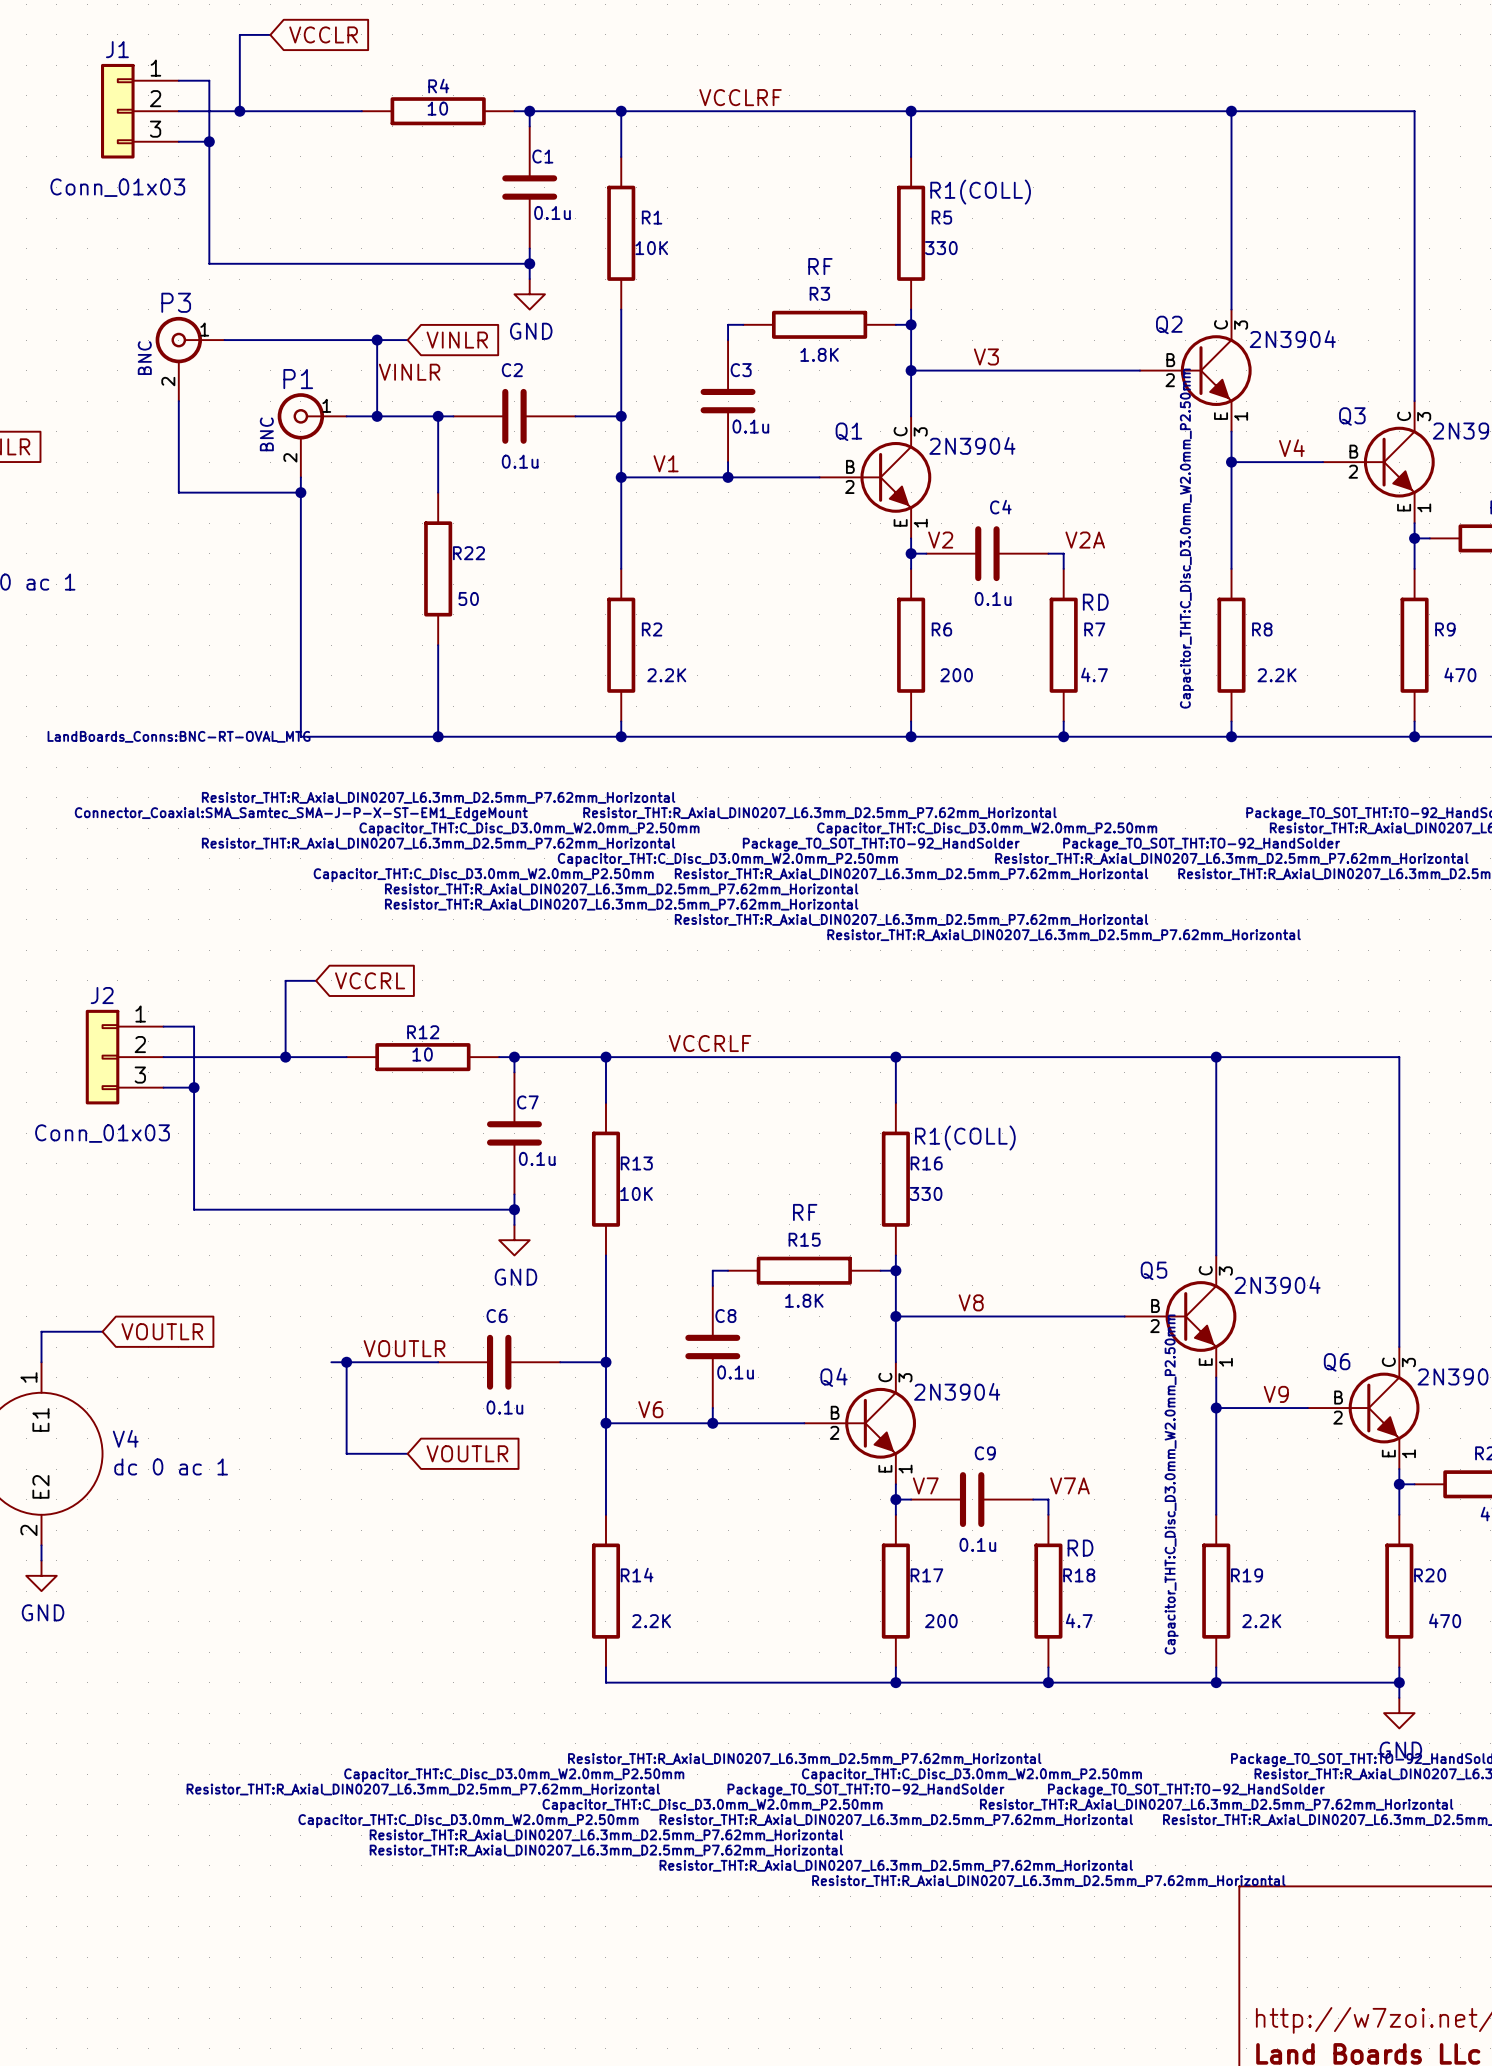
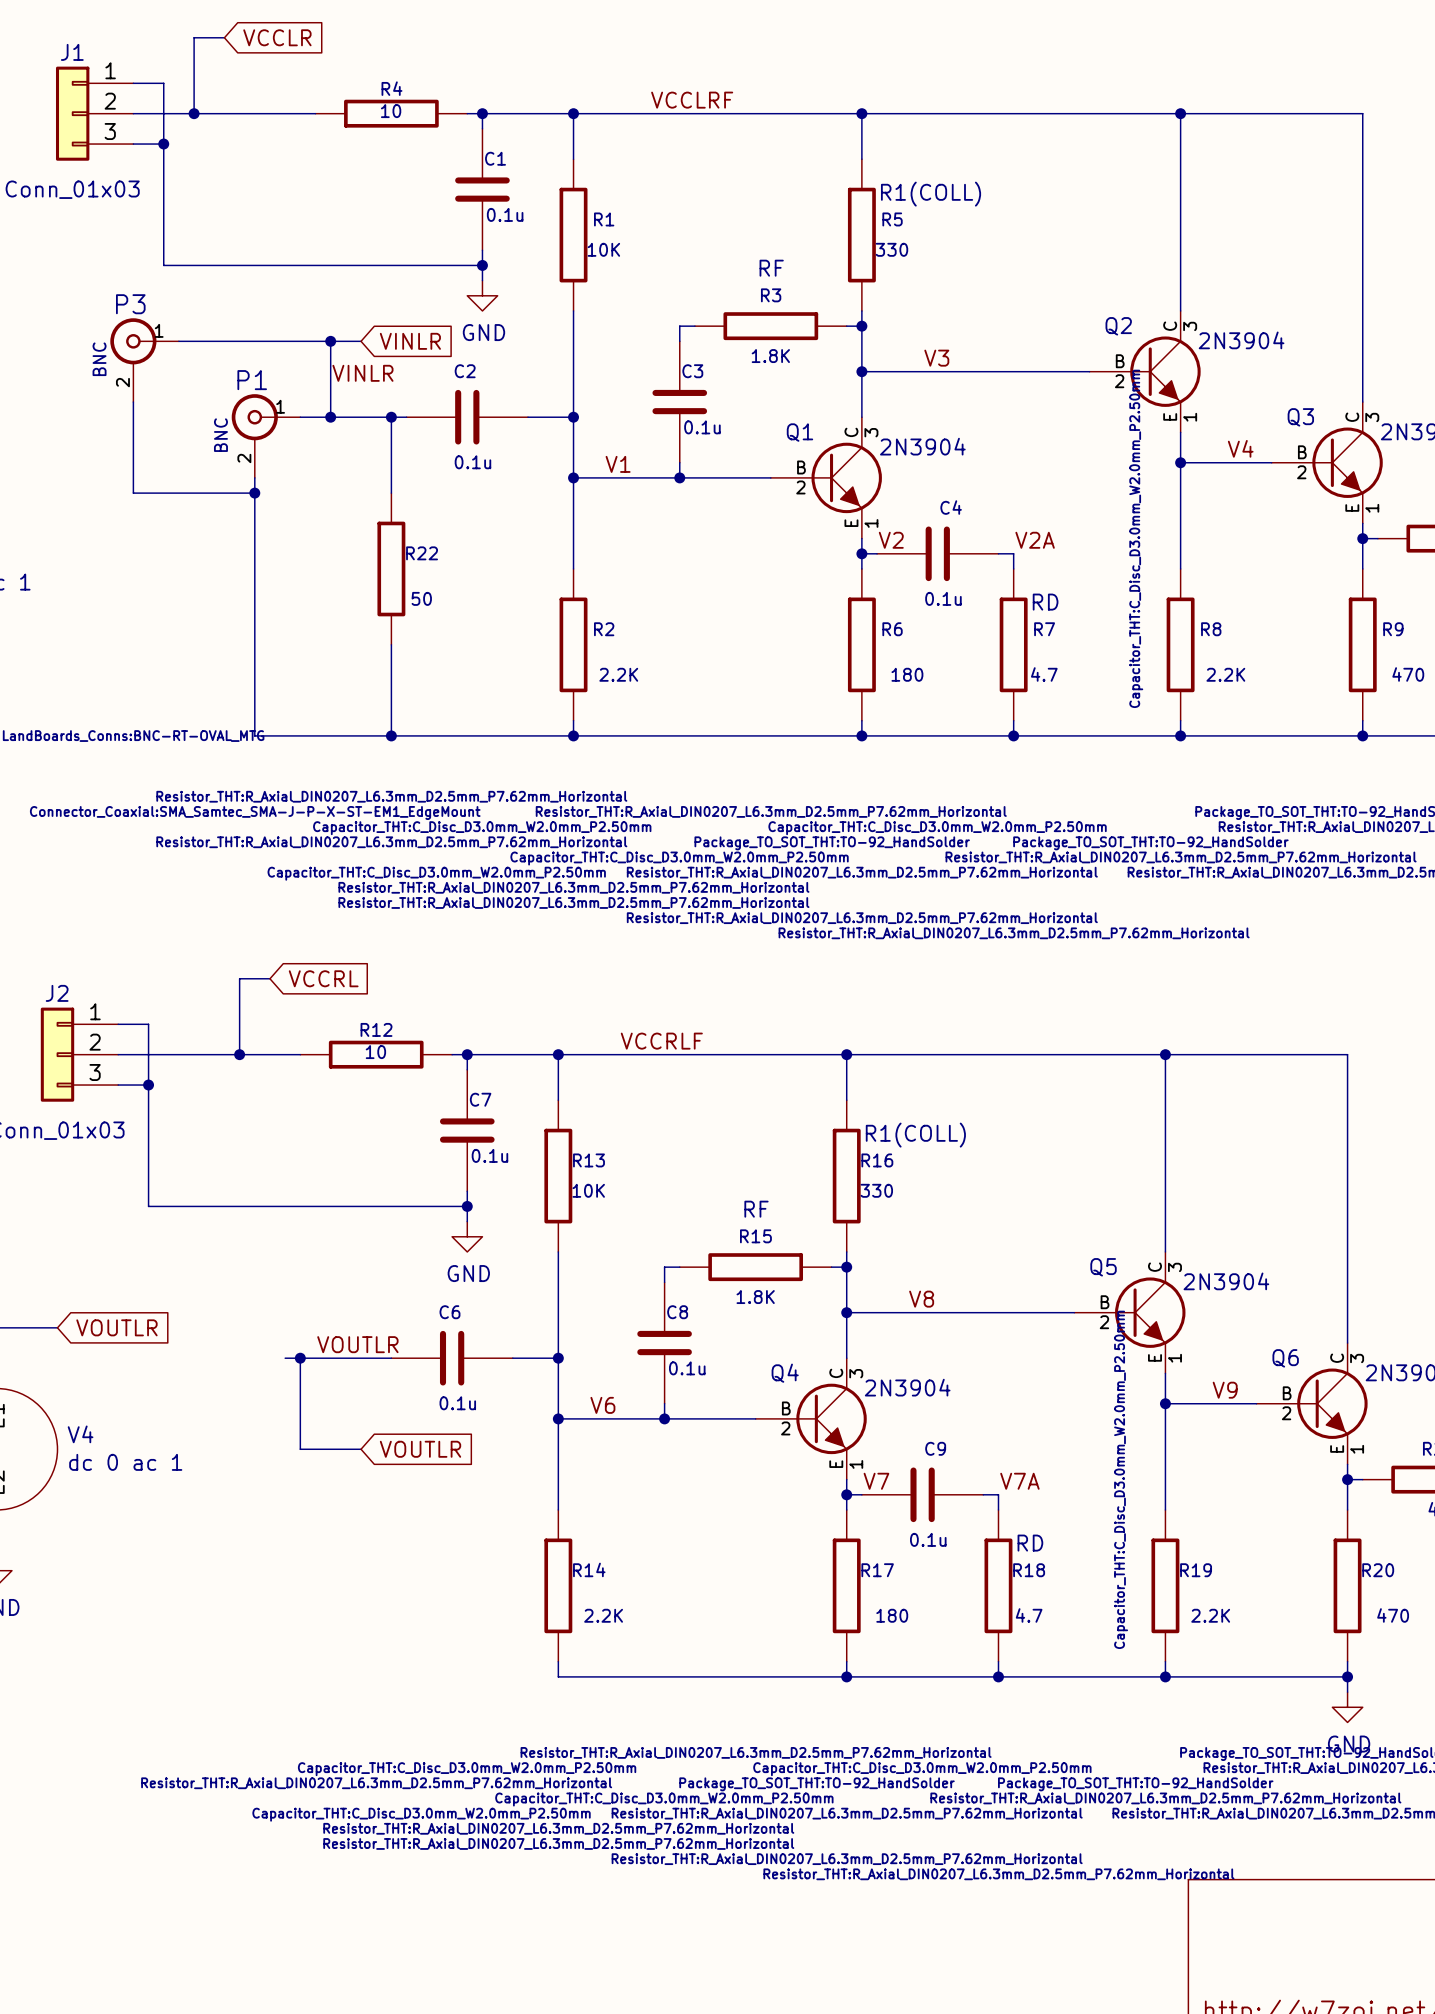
R6 value: 200 (956, 675) -> 180 (907, 674)
R17 value: 200 (941, 1621) -> 180 (892, 1615)

